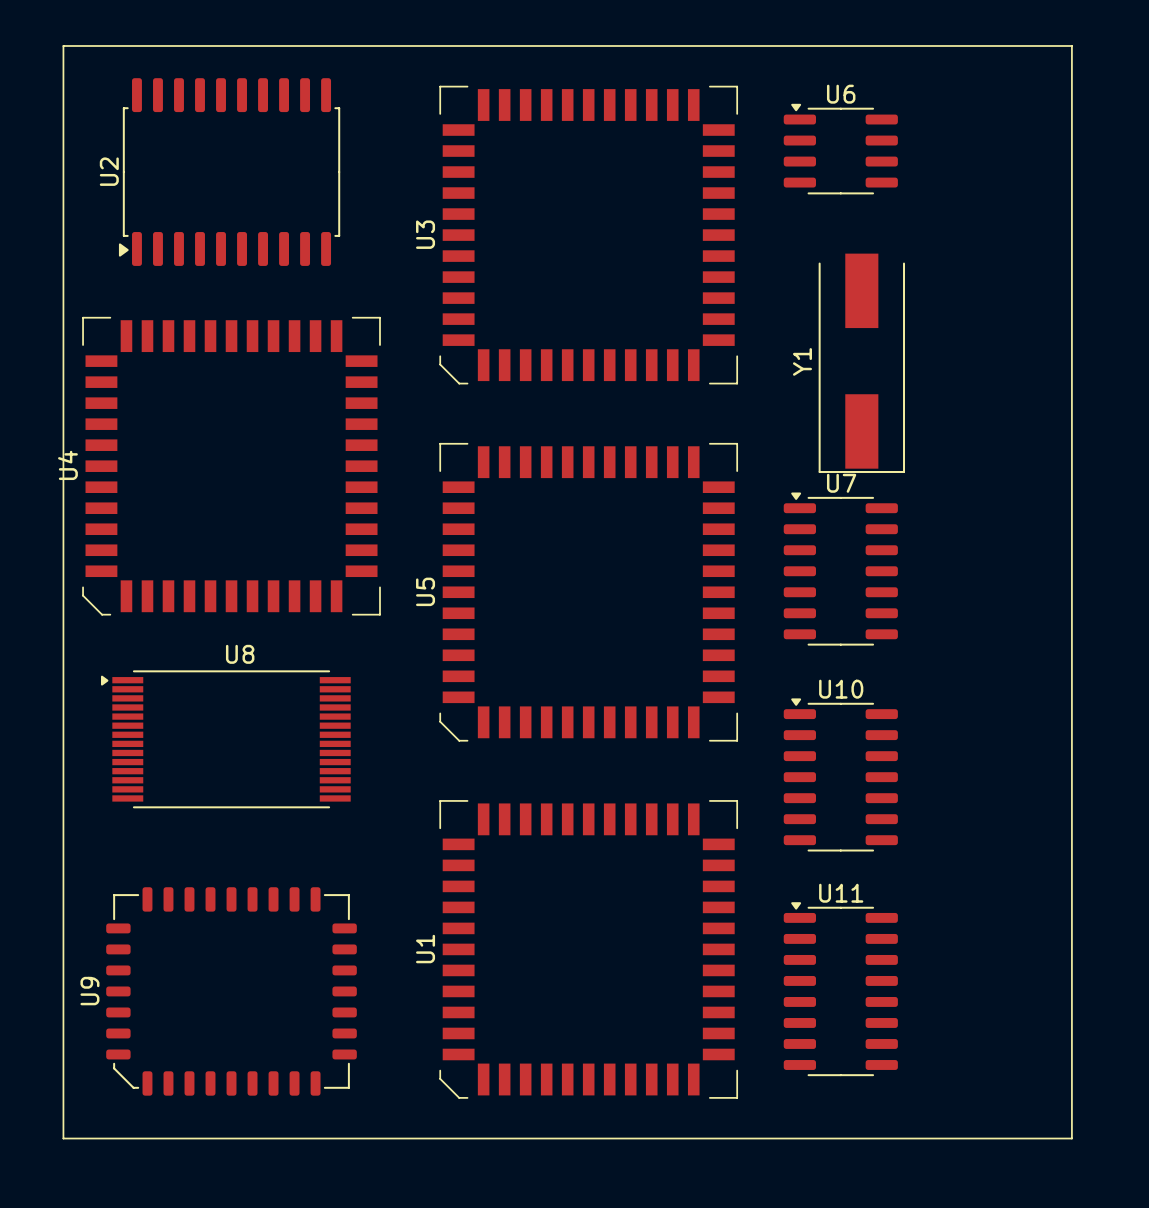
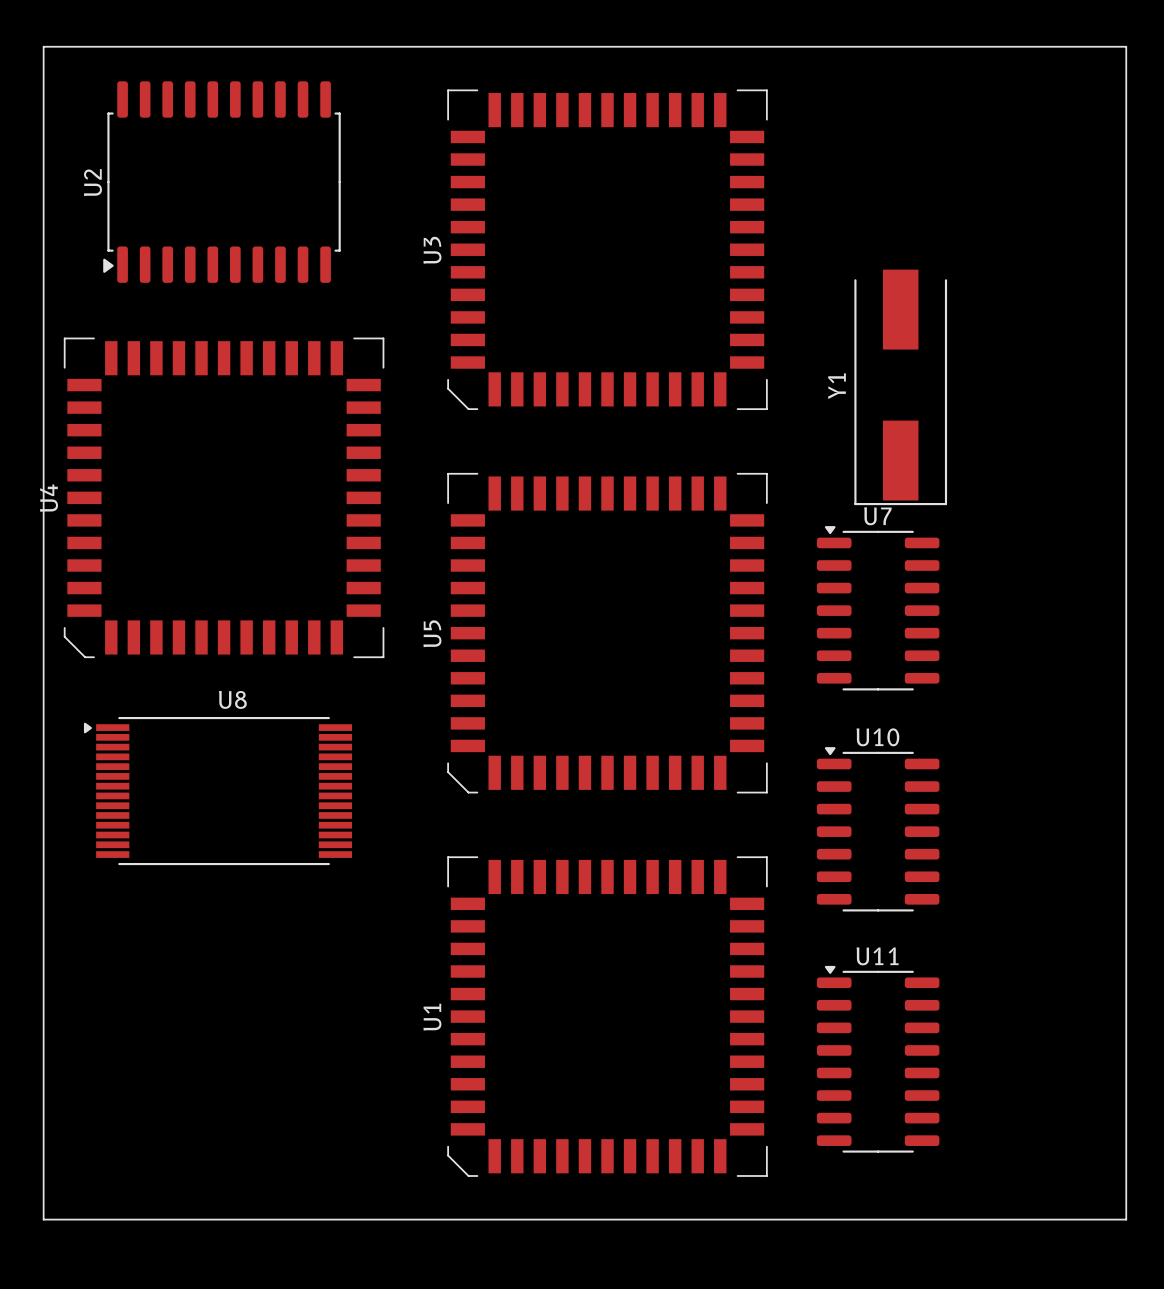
U6: (840, 149) -> none
U9: (231, 991) -> none

